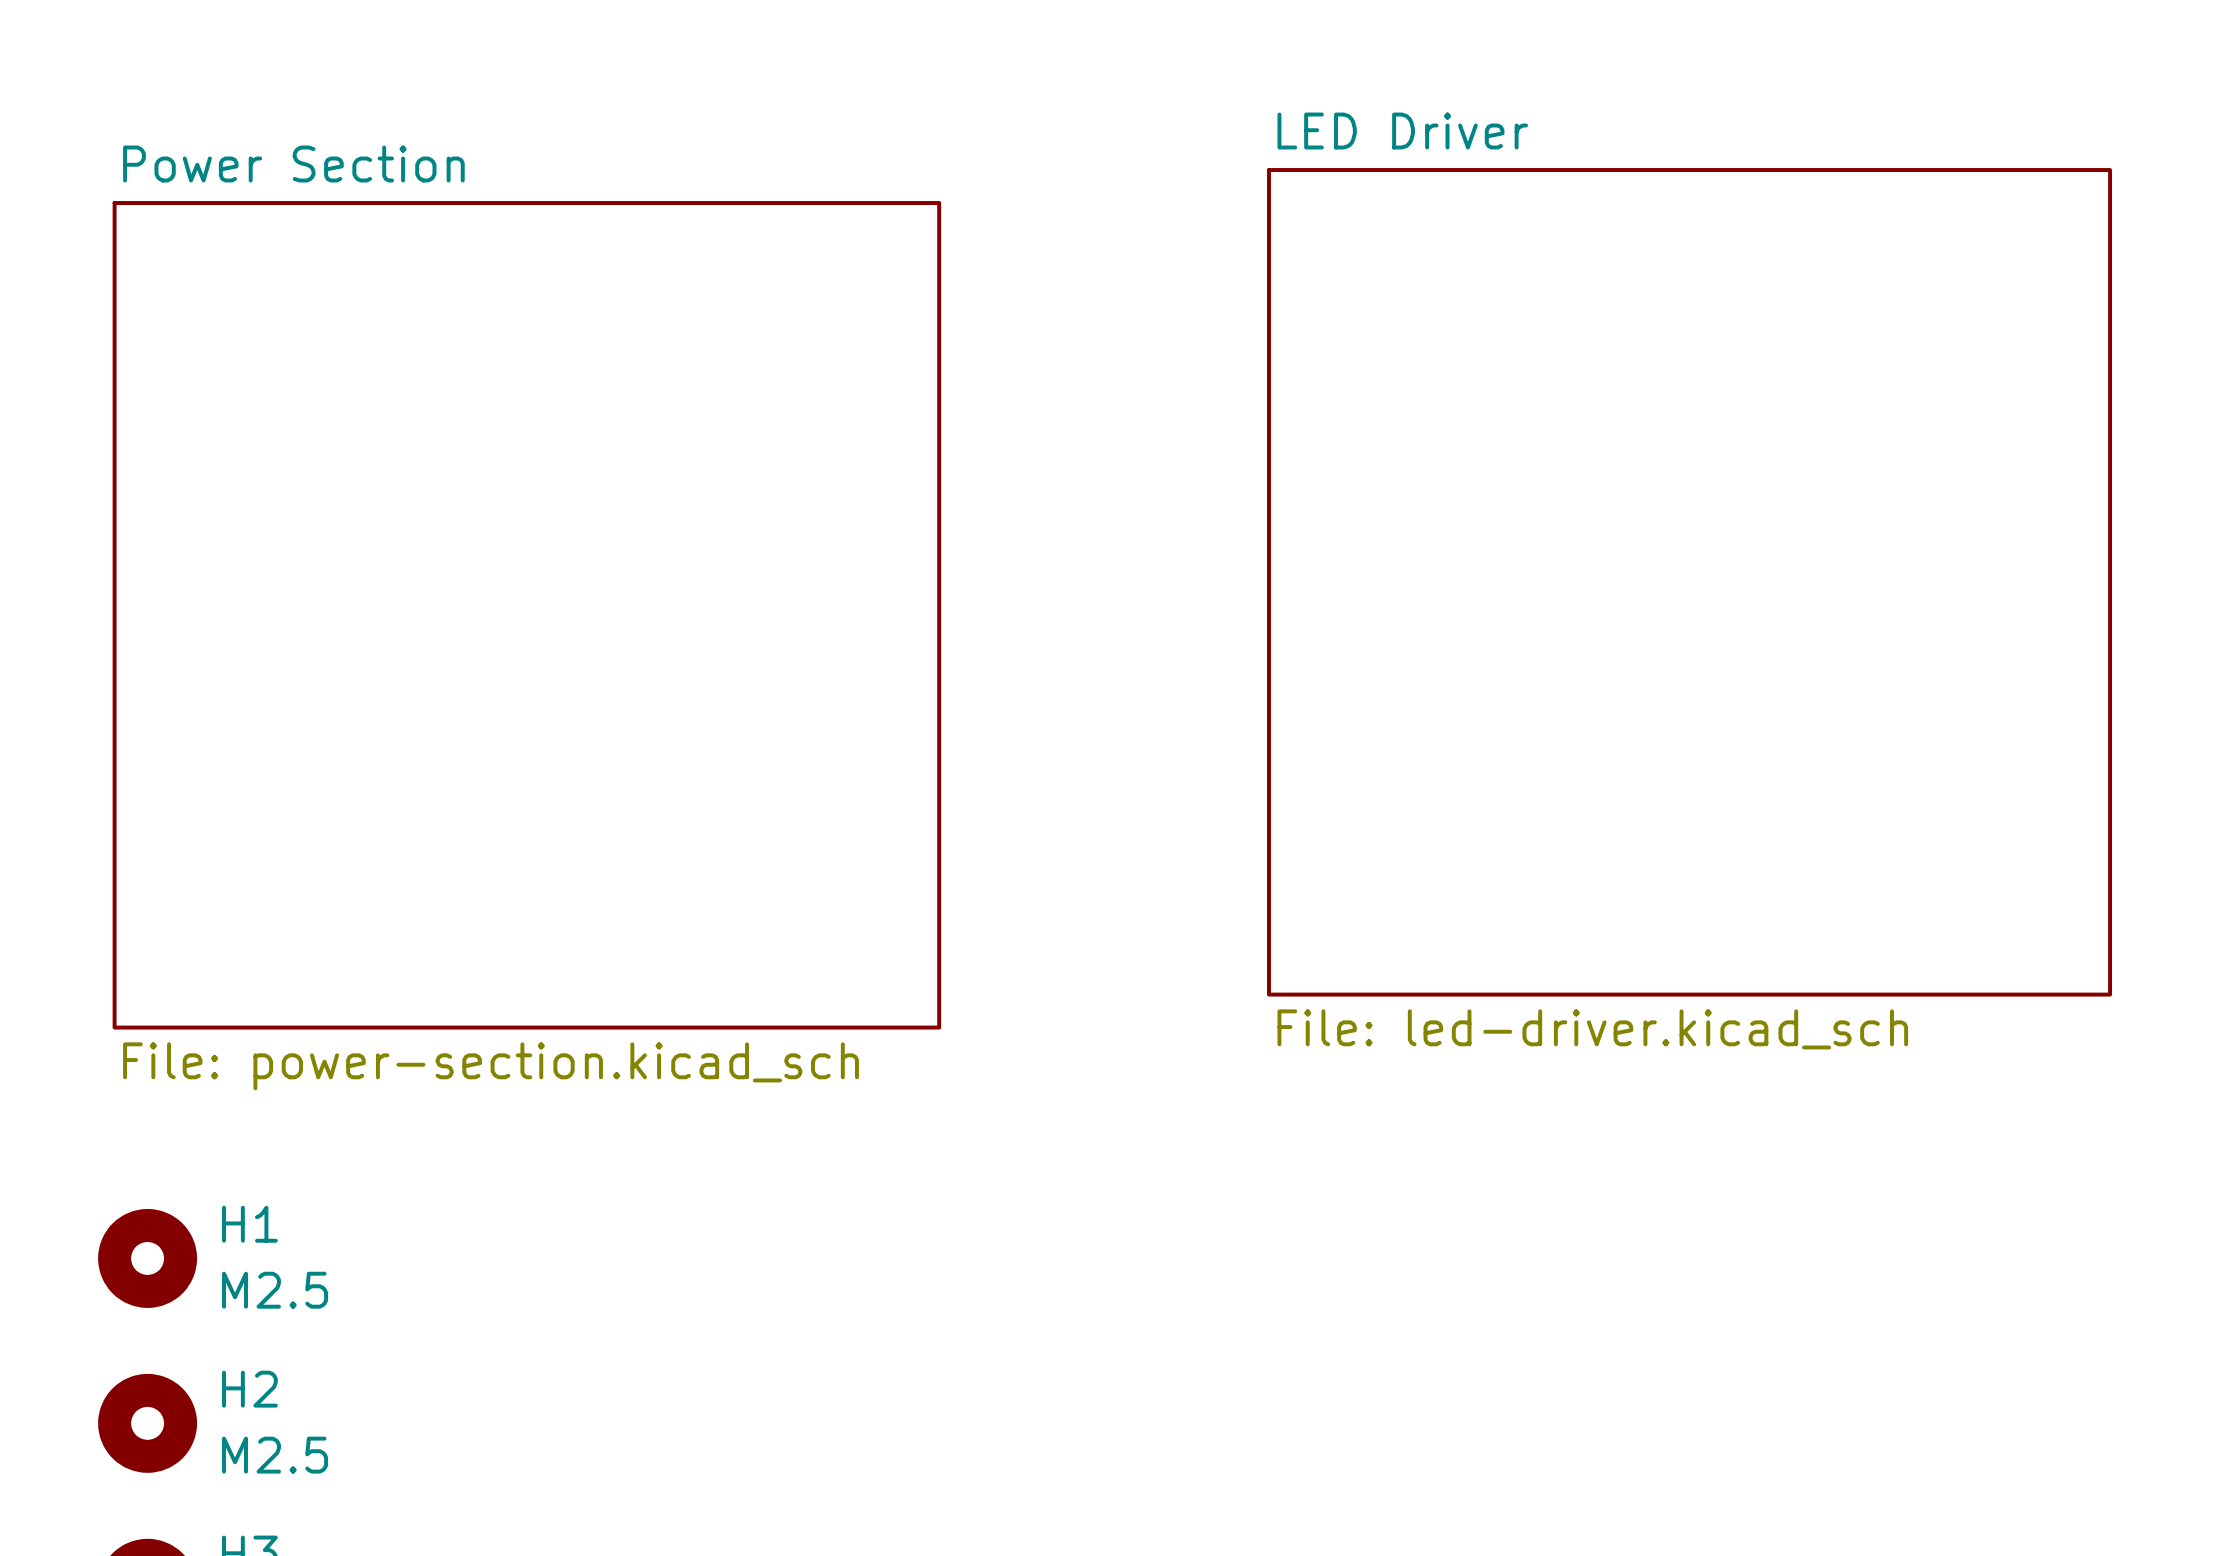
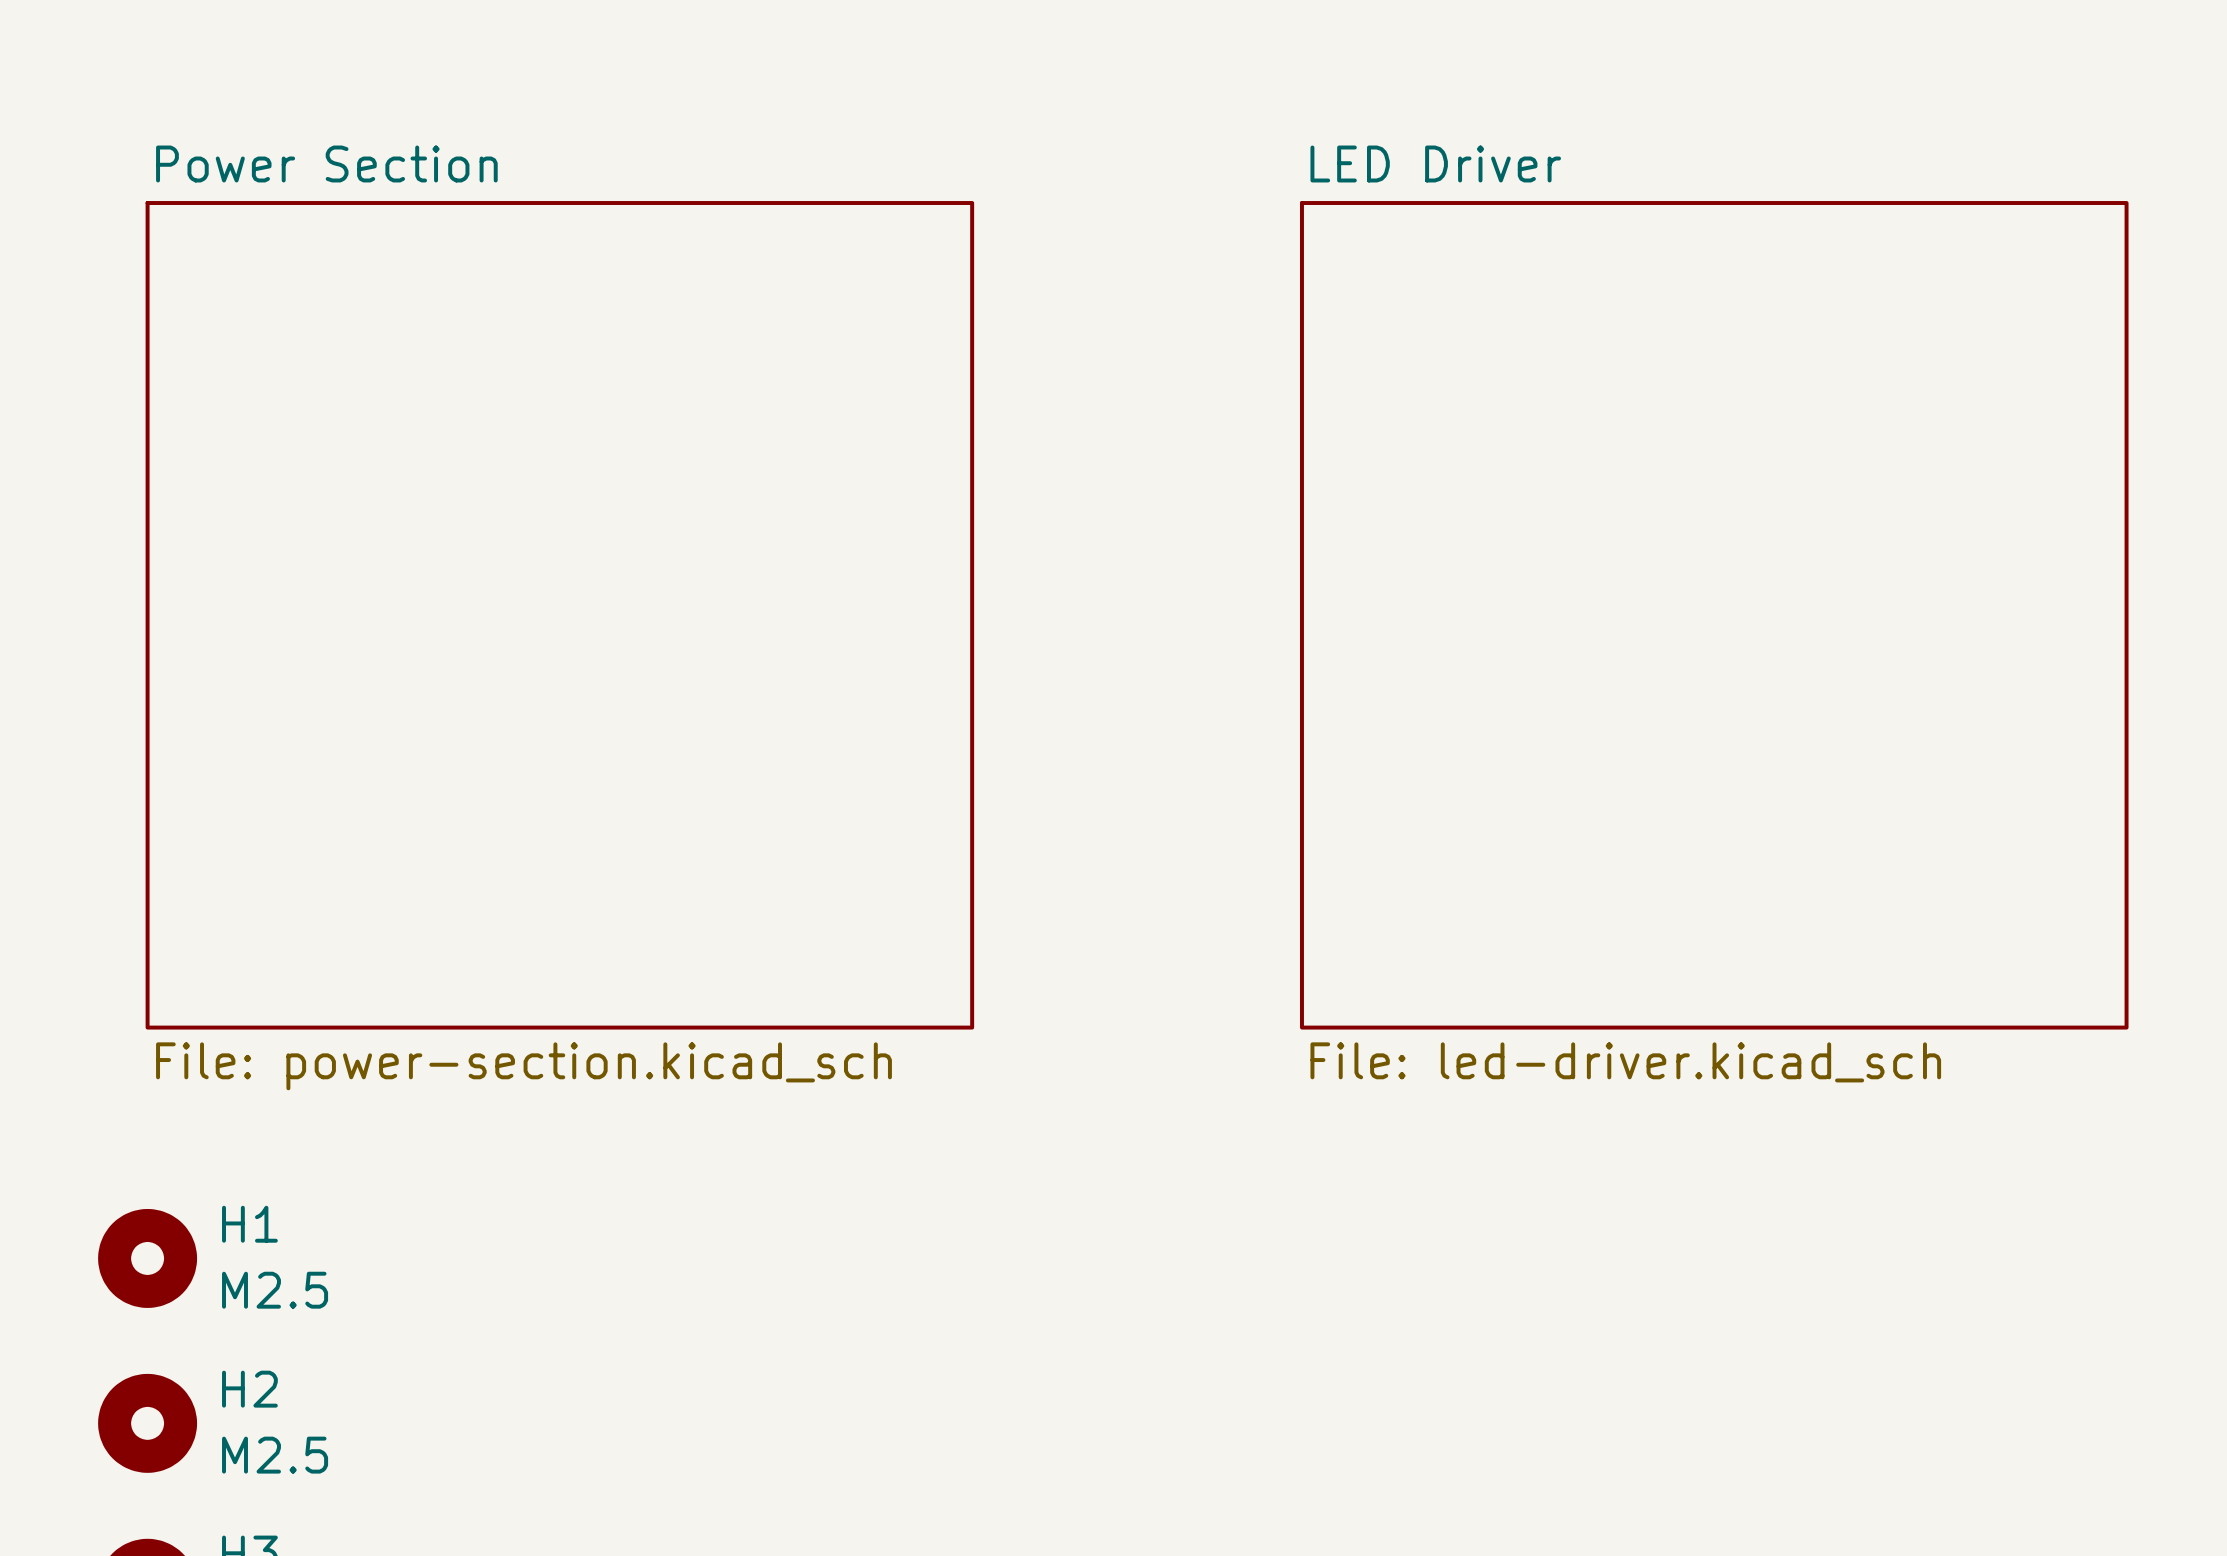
sheet LED Driver: File: led-driver.kicad_sch (1689, 582) -> none
sheet Power Section position: (526, 615) -> (559, 615)
sheet LED Driver: none -> File: led-driver.kicad_sch (1714, 615)

